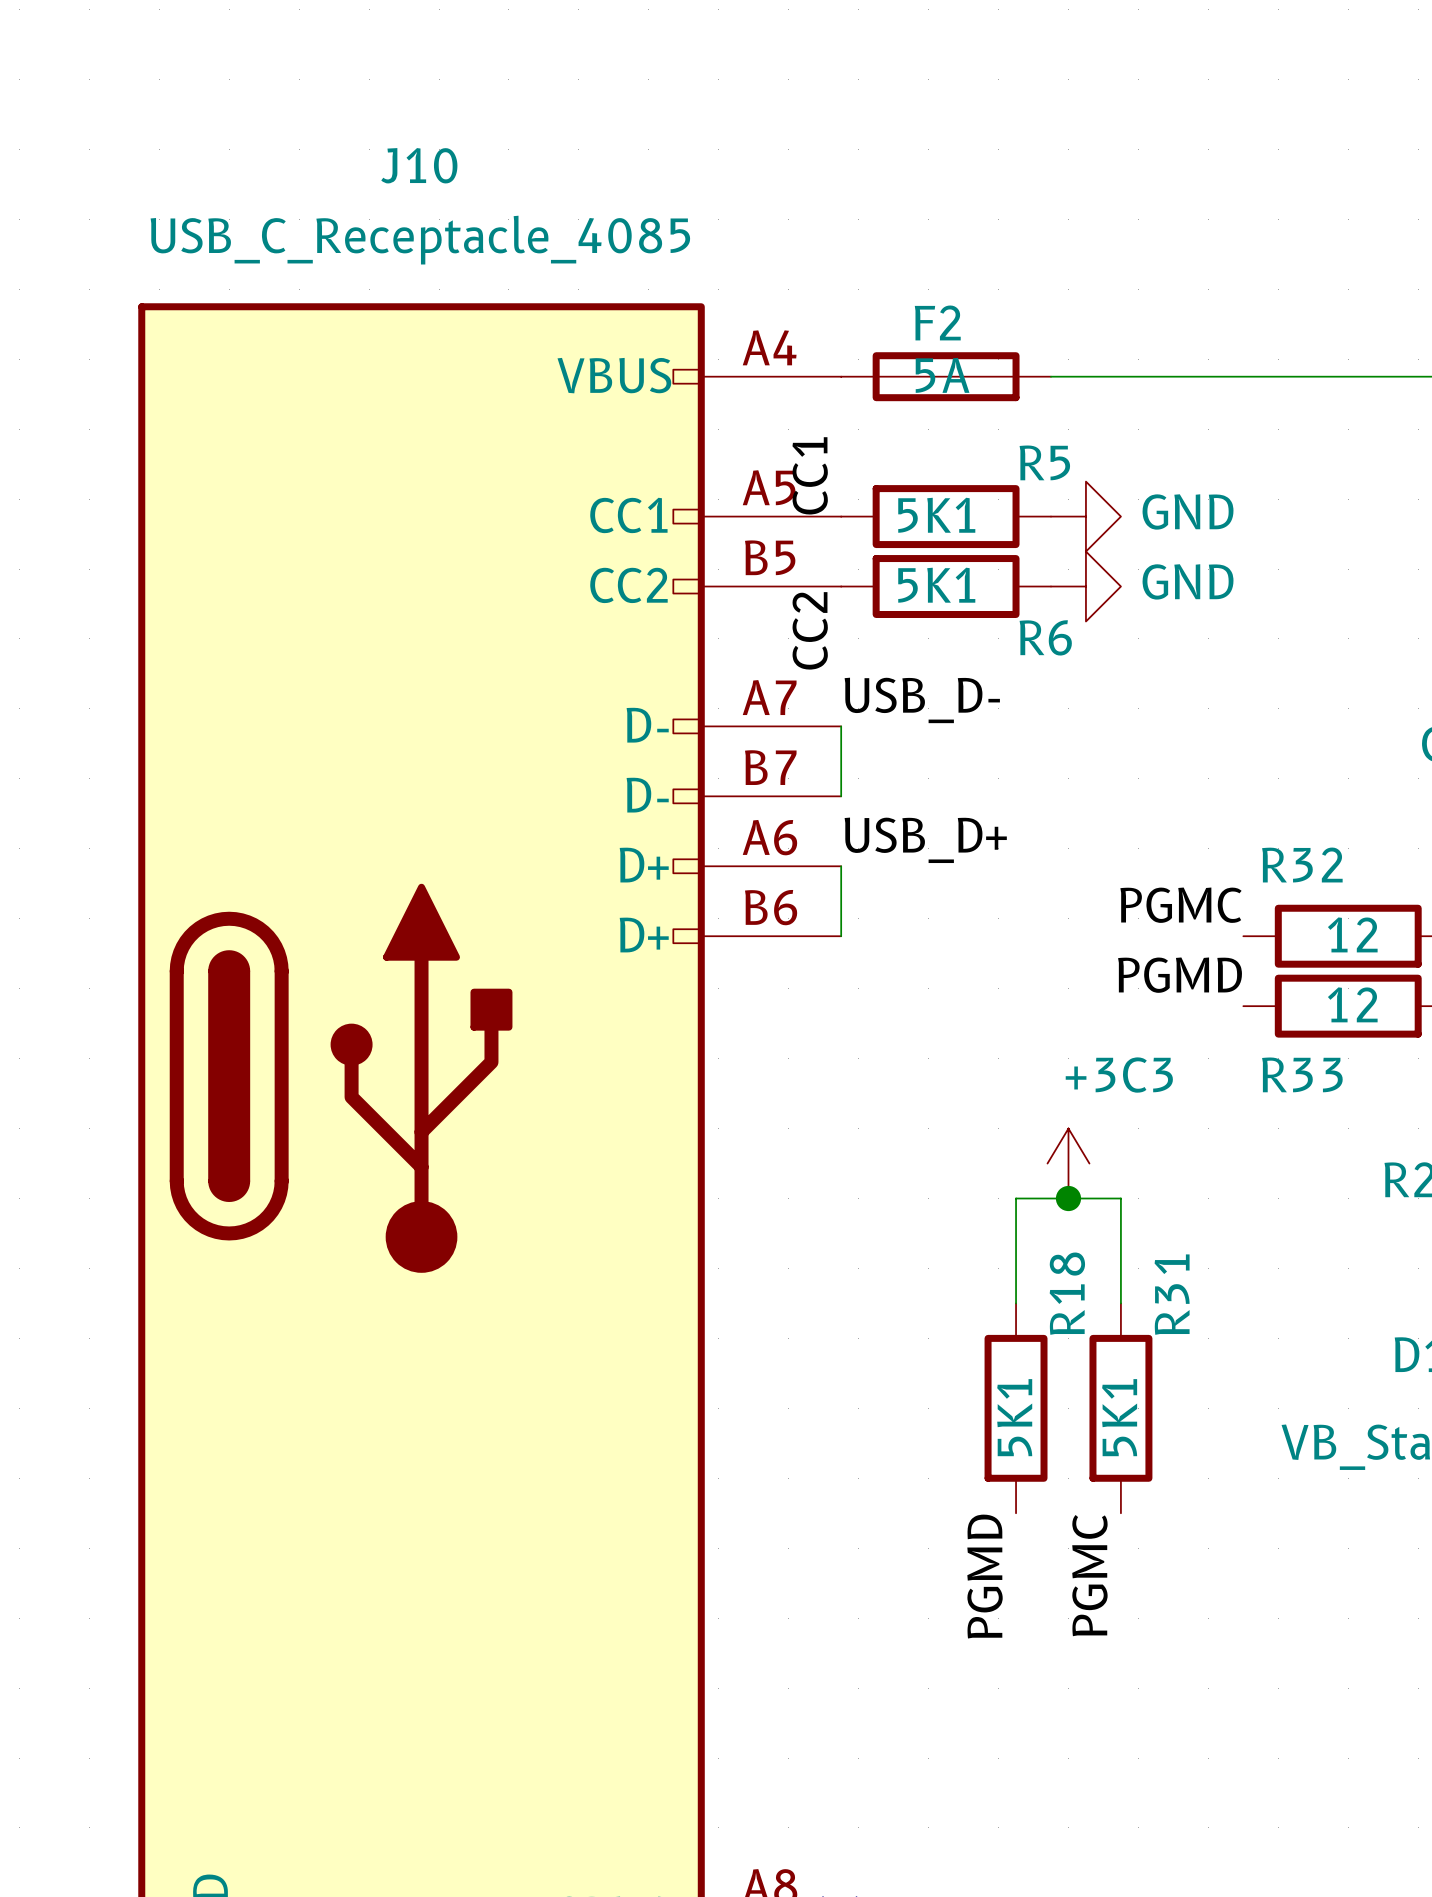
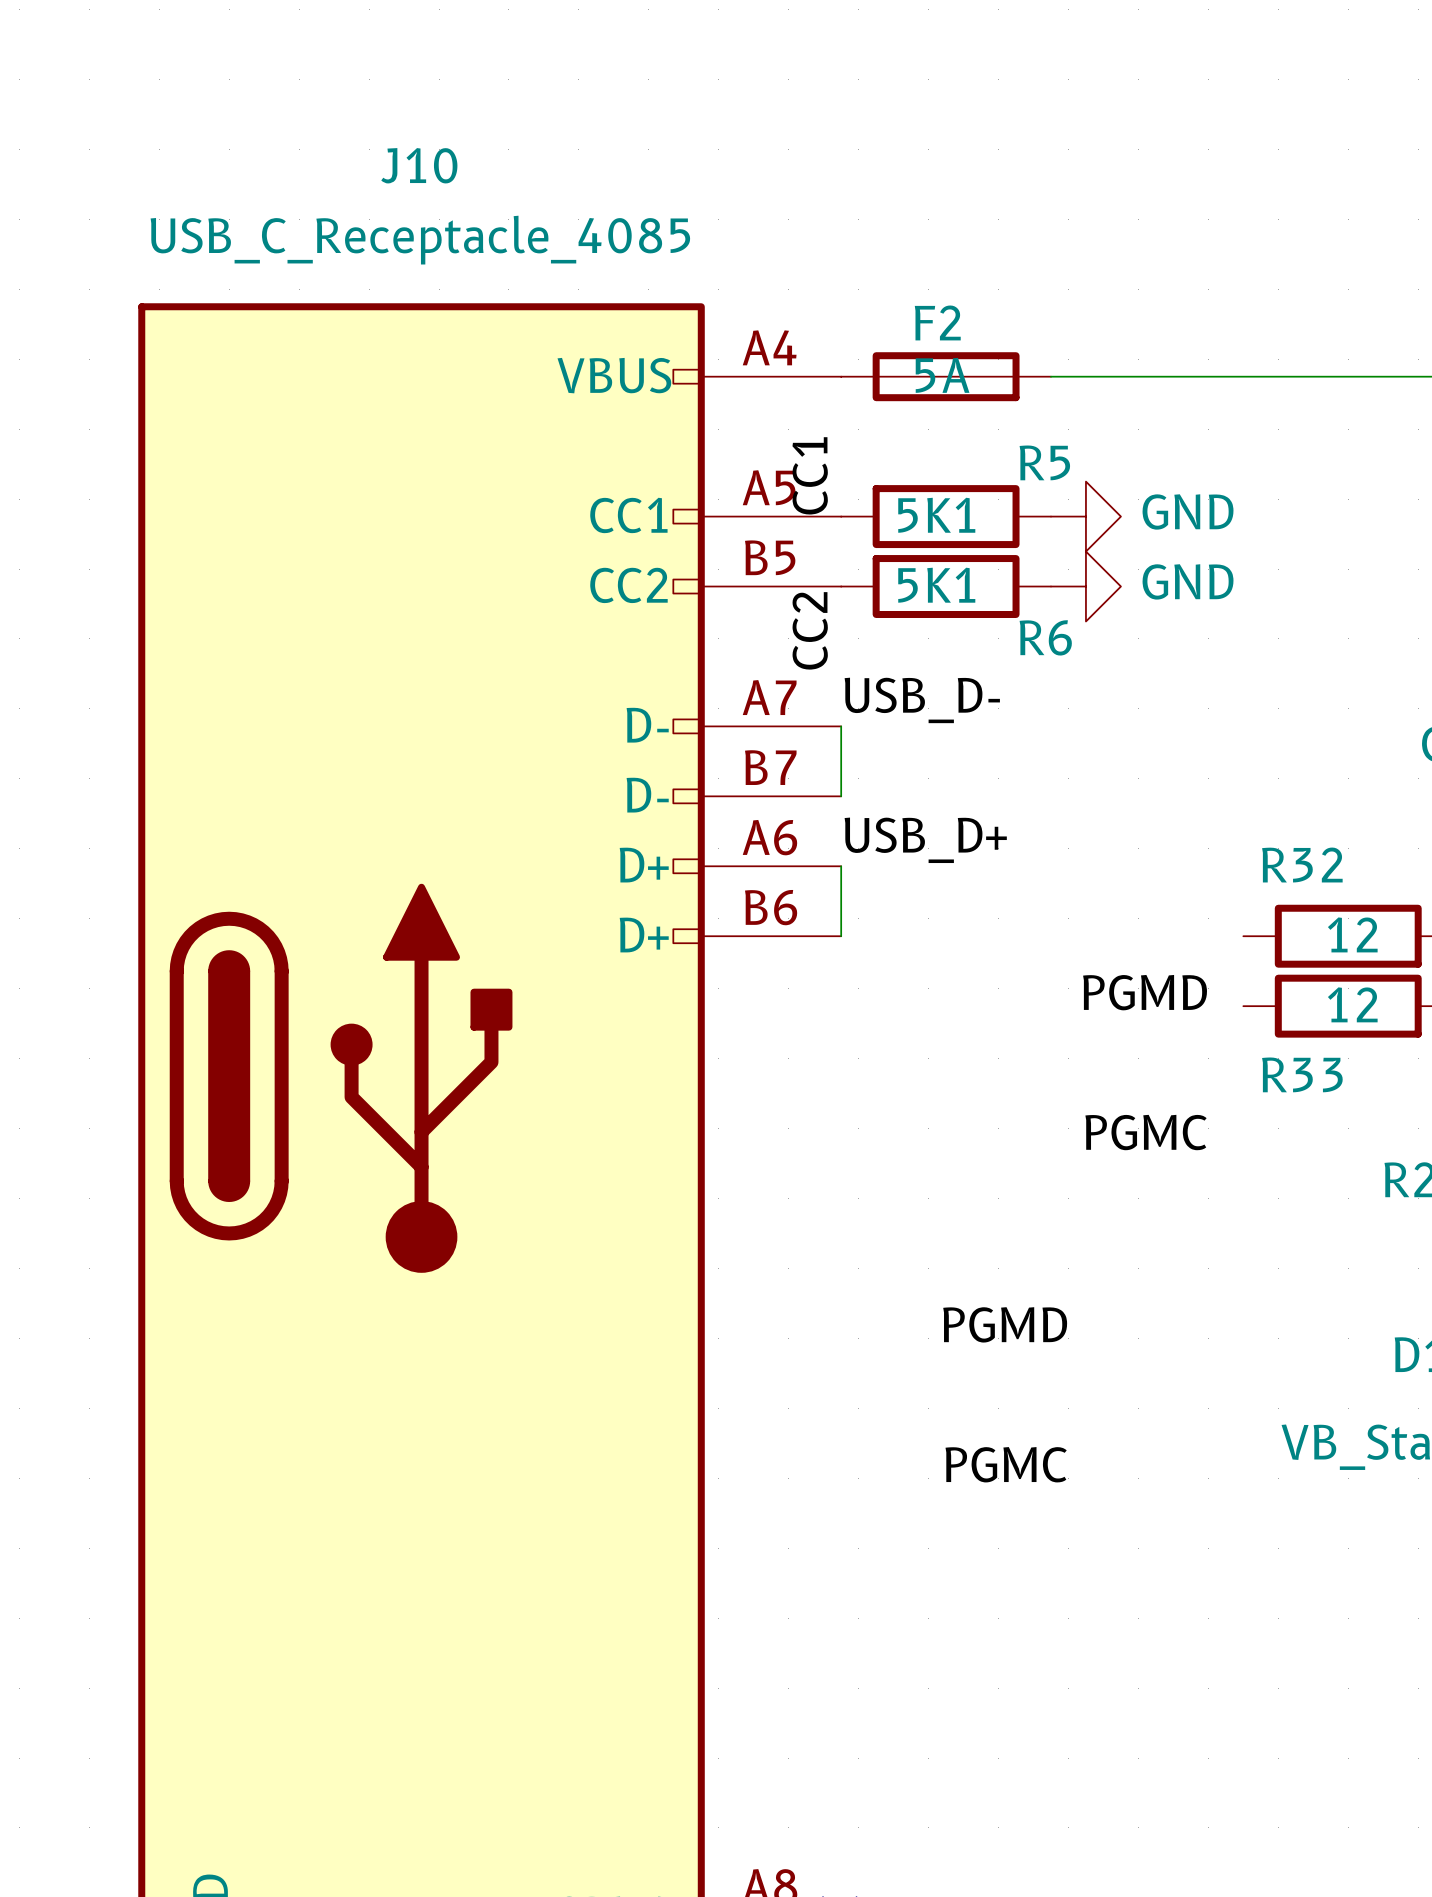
label: PGMC (1180, 905) -> none
label position: PGMD (1180, 975) -> PGMD (1145, 992)
label: none -> PGMC (1146, 1132)
power symbol: +3C3 (1068, 1163) -> none
junction: (1068, 1198) -> none
wire: (1016, 1303) (1016, 1198) (1120, 1198) (1120, 1303) -> none
R18: 5K1 (1016, 1408) -> none
R31: 5K1 (1120, 1408) -> none
label rotation: 0° (1089, 1575) -> 90° clockwise (1006, 1464)
label rotation: 0° (985, 1576) -> 90° clockwise (1005, 1324)
label position: PGMD (985, 1576) -> PGMD (1005, 1324)

